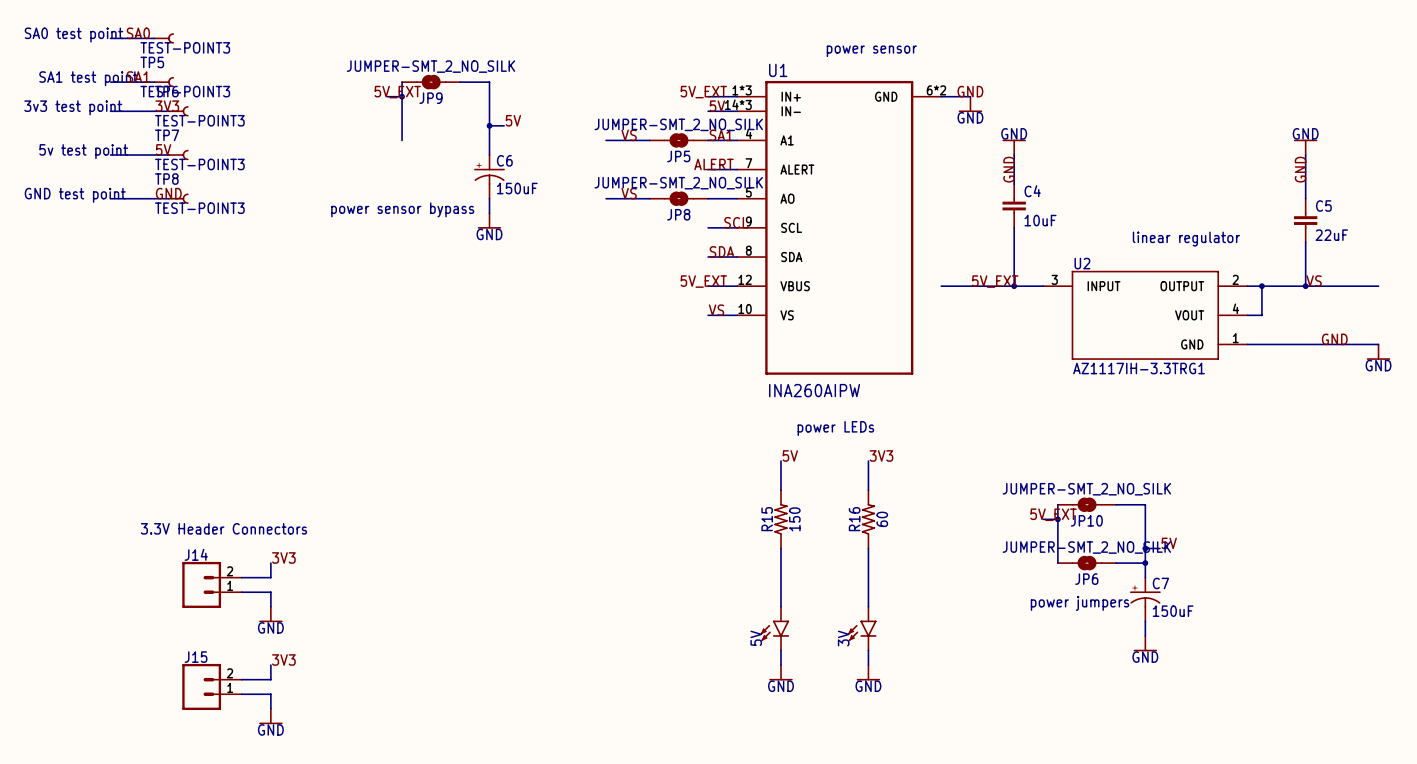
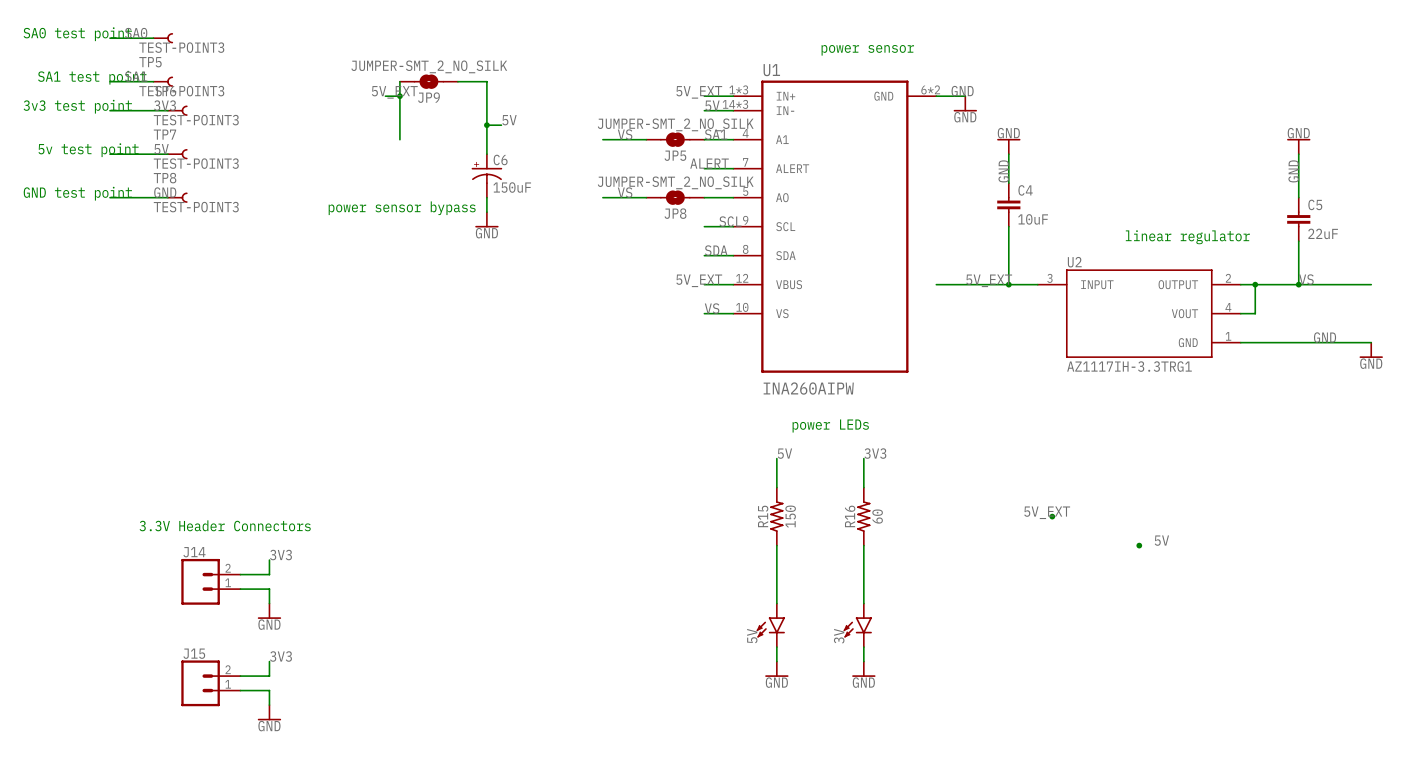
wire: (1057, 504) (1057, 563) -> none
JP10: JUMPER-SMT_2_NO_SILK (1087, 504) -> none
wire: (1116, 504) (1145, 504) (1145, 577) -> none
wire: (1043, 519) (1057, 519) -> none
wire: (1145, 548) (1159, 548) -> none
JP6: JUMPER-SMT_2_NO_SILK (1087, 563) -> none
wire: (1116, 563) (1145, 563) -> none
junction: (1145, 563) -> none
C7: 150uF (1145, 599) -> none
text: power jumpers (1080, 603) -> none
wire: (1145, 621) (1145, 635) -> none
power symbol: GND (1145, 643) -> none

